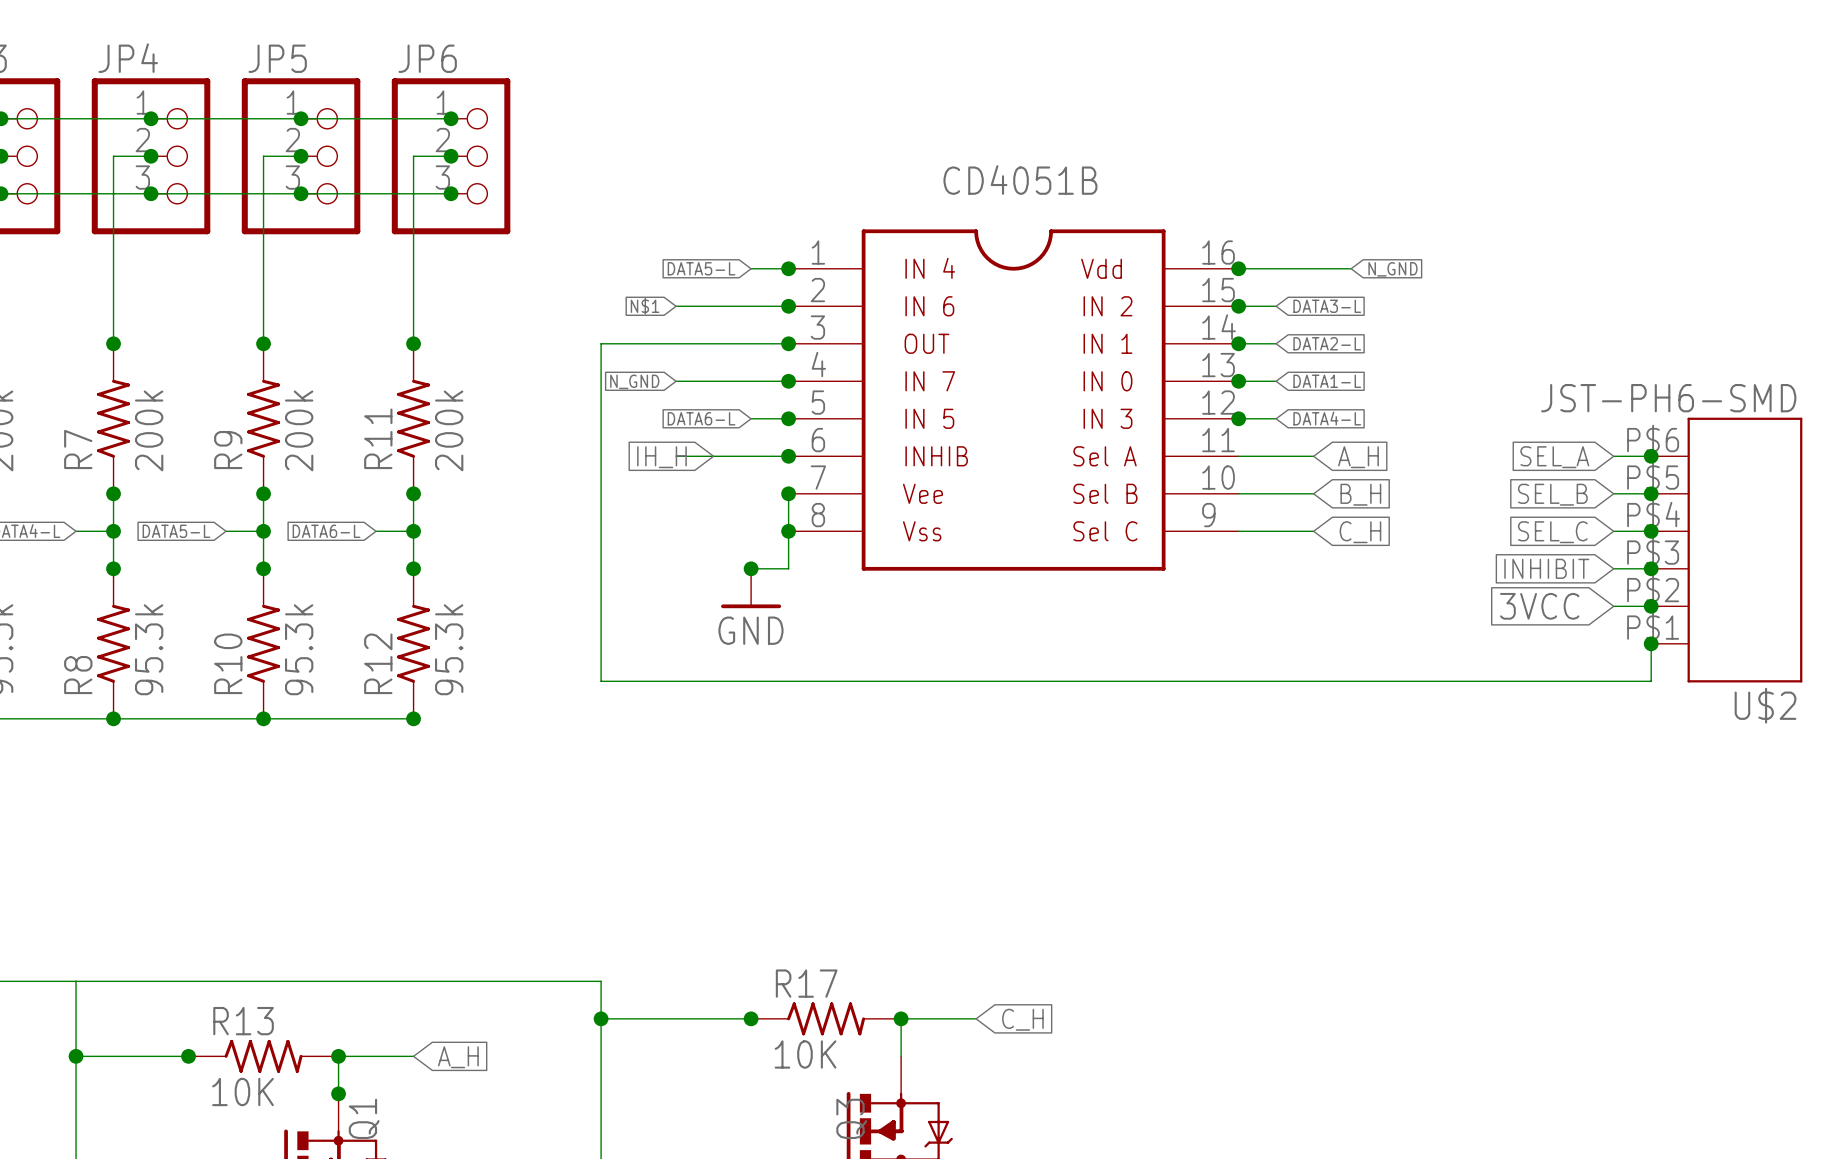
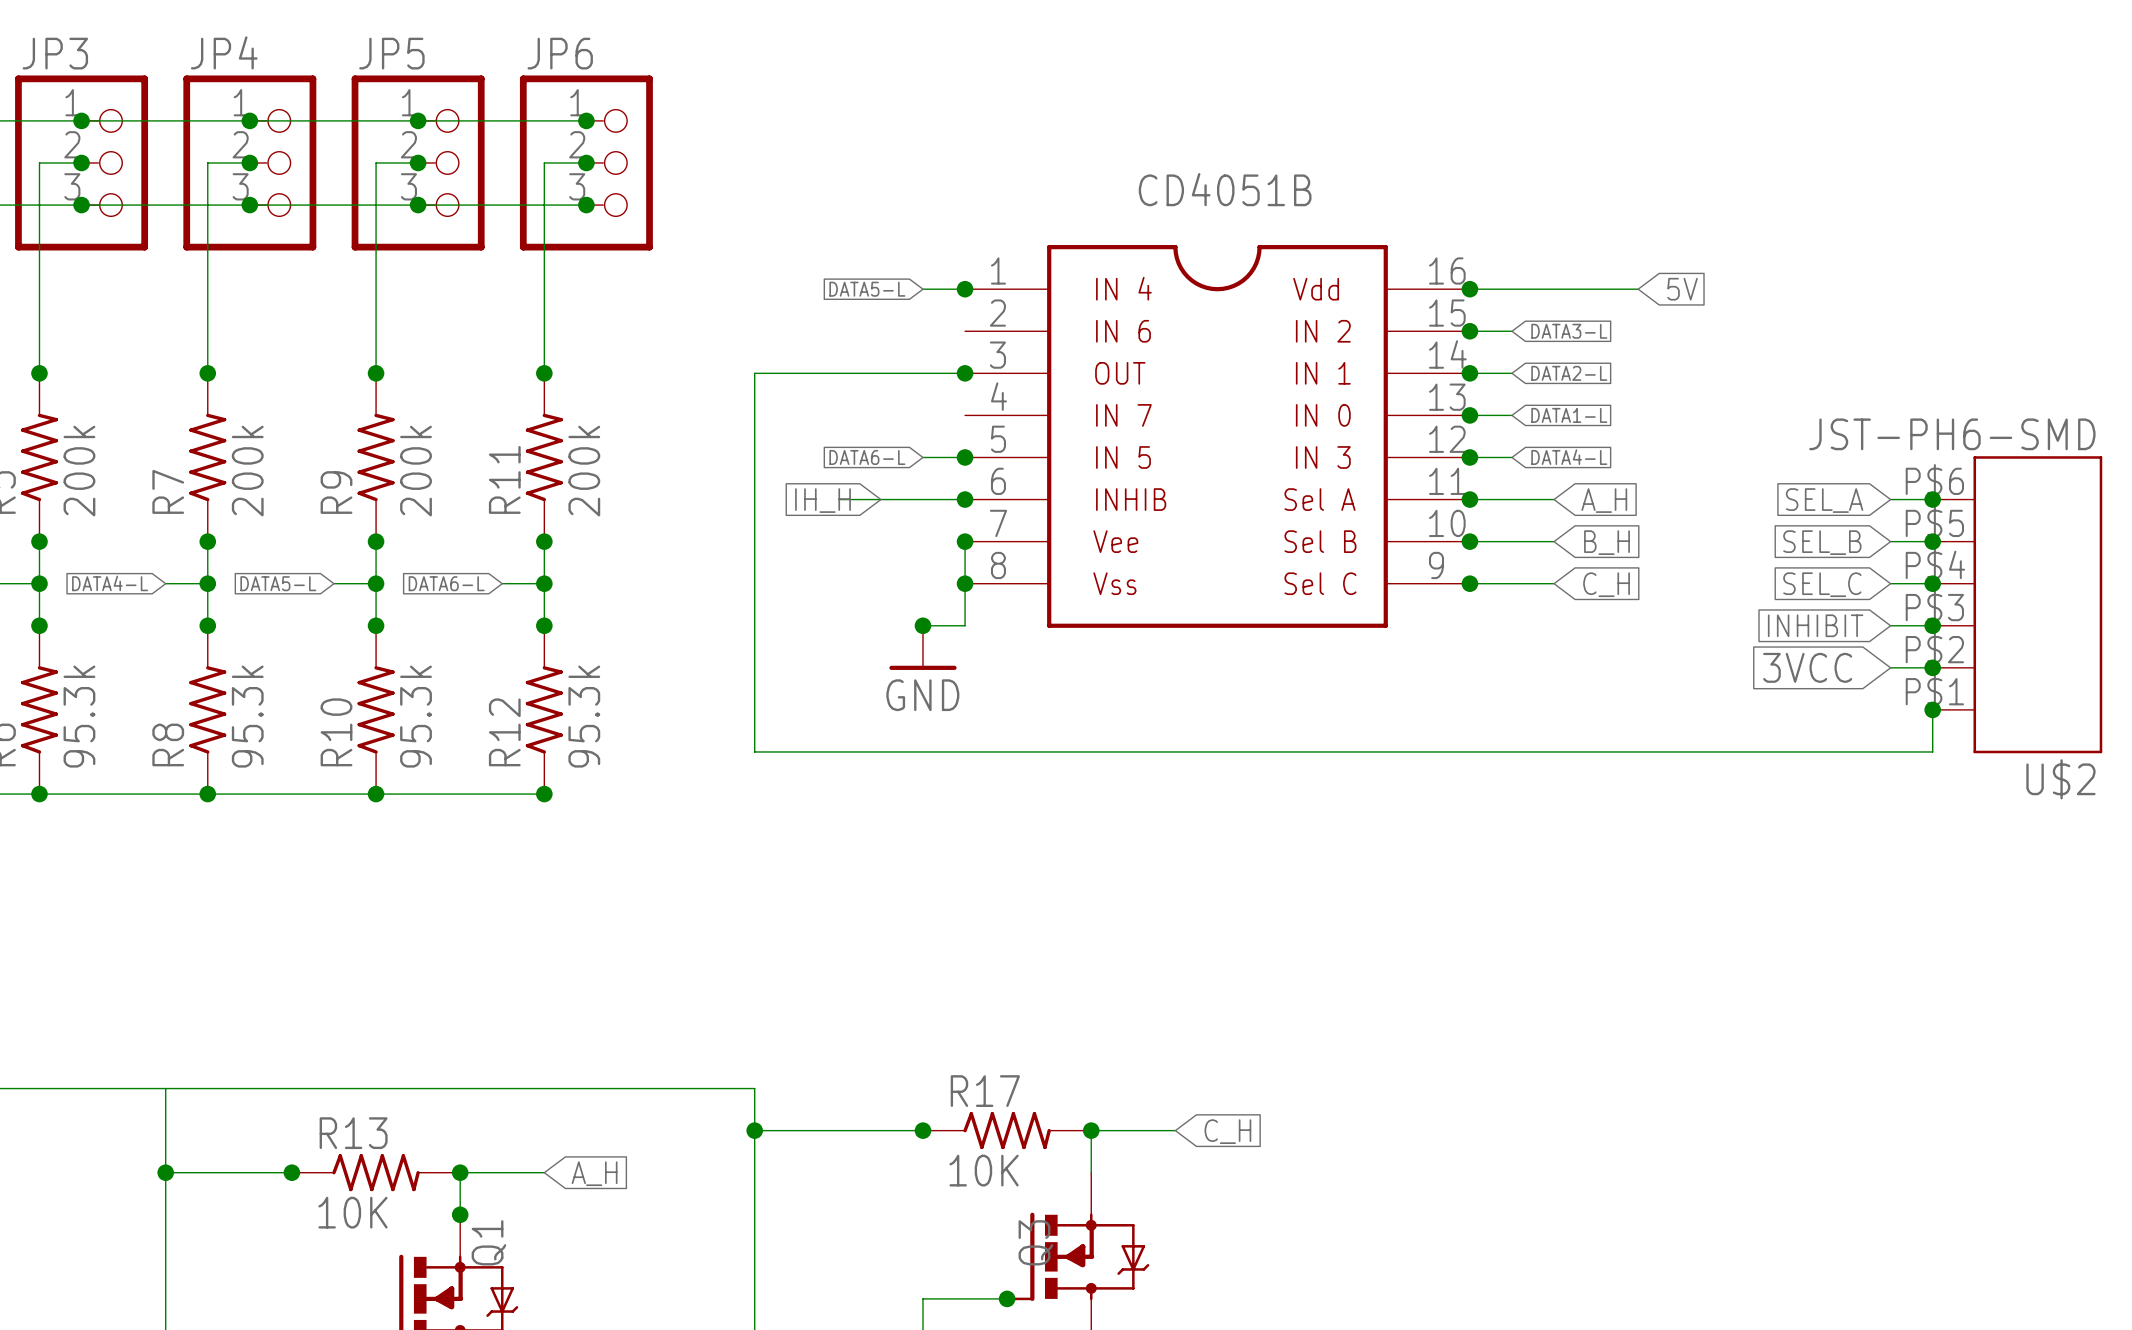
wire: none -> (1596, 289) (1638, 289)
global label: none -> 5V (1682, 289)
global label: N_GND (1393, 269) -> none
global label: N$1 (645, 306) -> none
wire: (676, 306) (788, 306) -> none
junction: (788, 306) -> none
global label: N_GND (634, 381) -> none
wire: (676, 381) (788, 381) -> none
junction: (788, 381) -> none
junction: none -> (1469, 499)
junction: none -> (1469, 541)
junction: none -> (1469, 583)

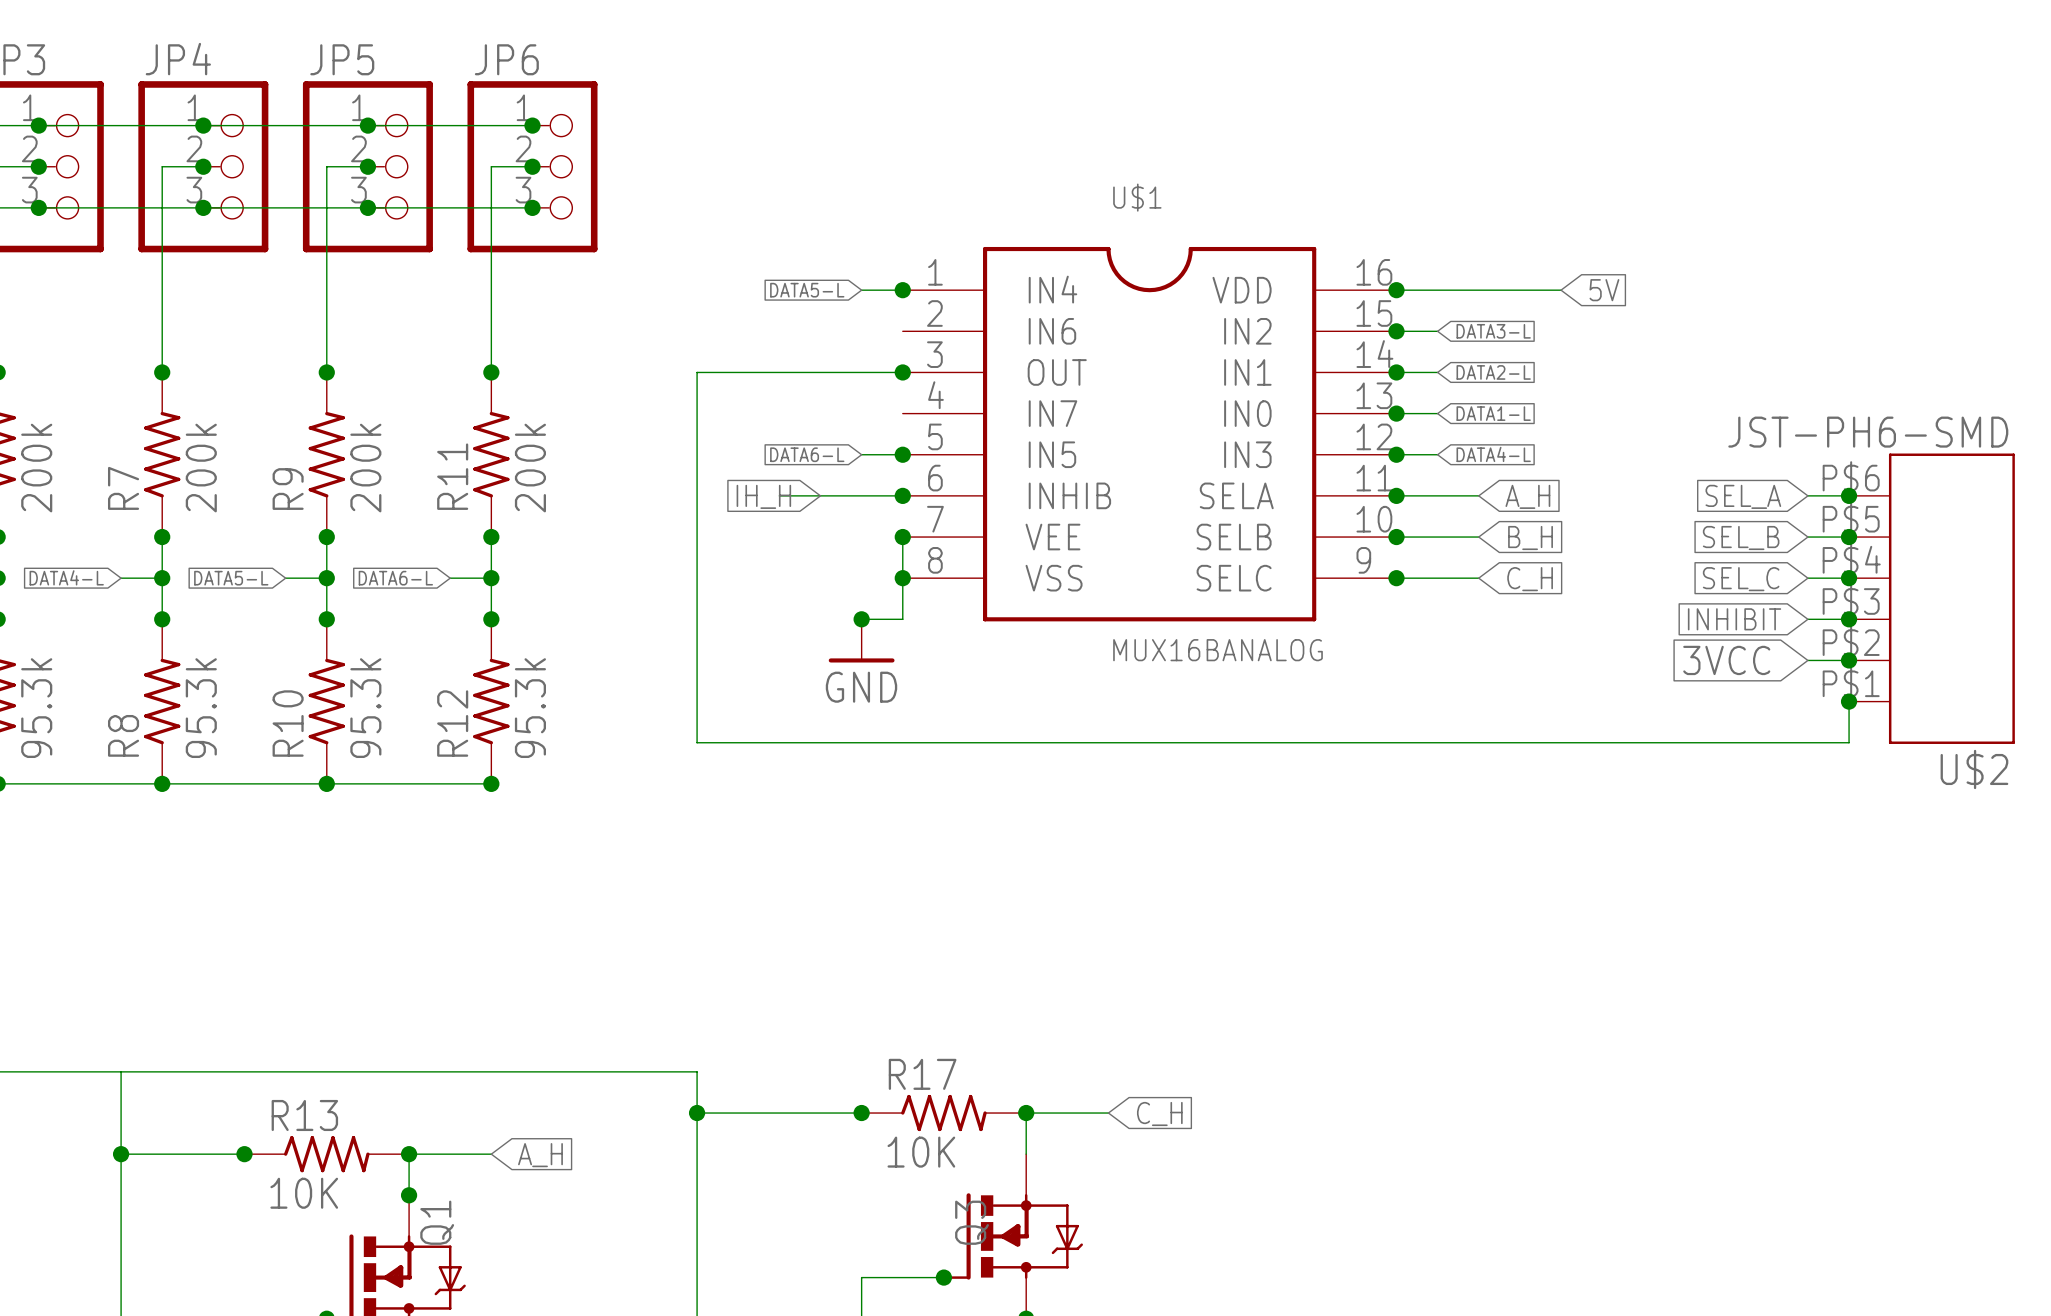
U$1 name: none -> U$1 (1137, 197)
U$1 symbol: [965, 245, 1470, 628] -> [902, 246, 1397, 622]
U$1 value: none -> MUX16BANALOG (1218, 650)

